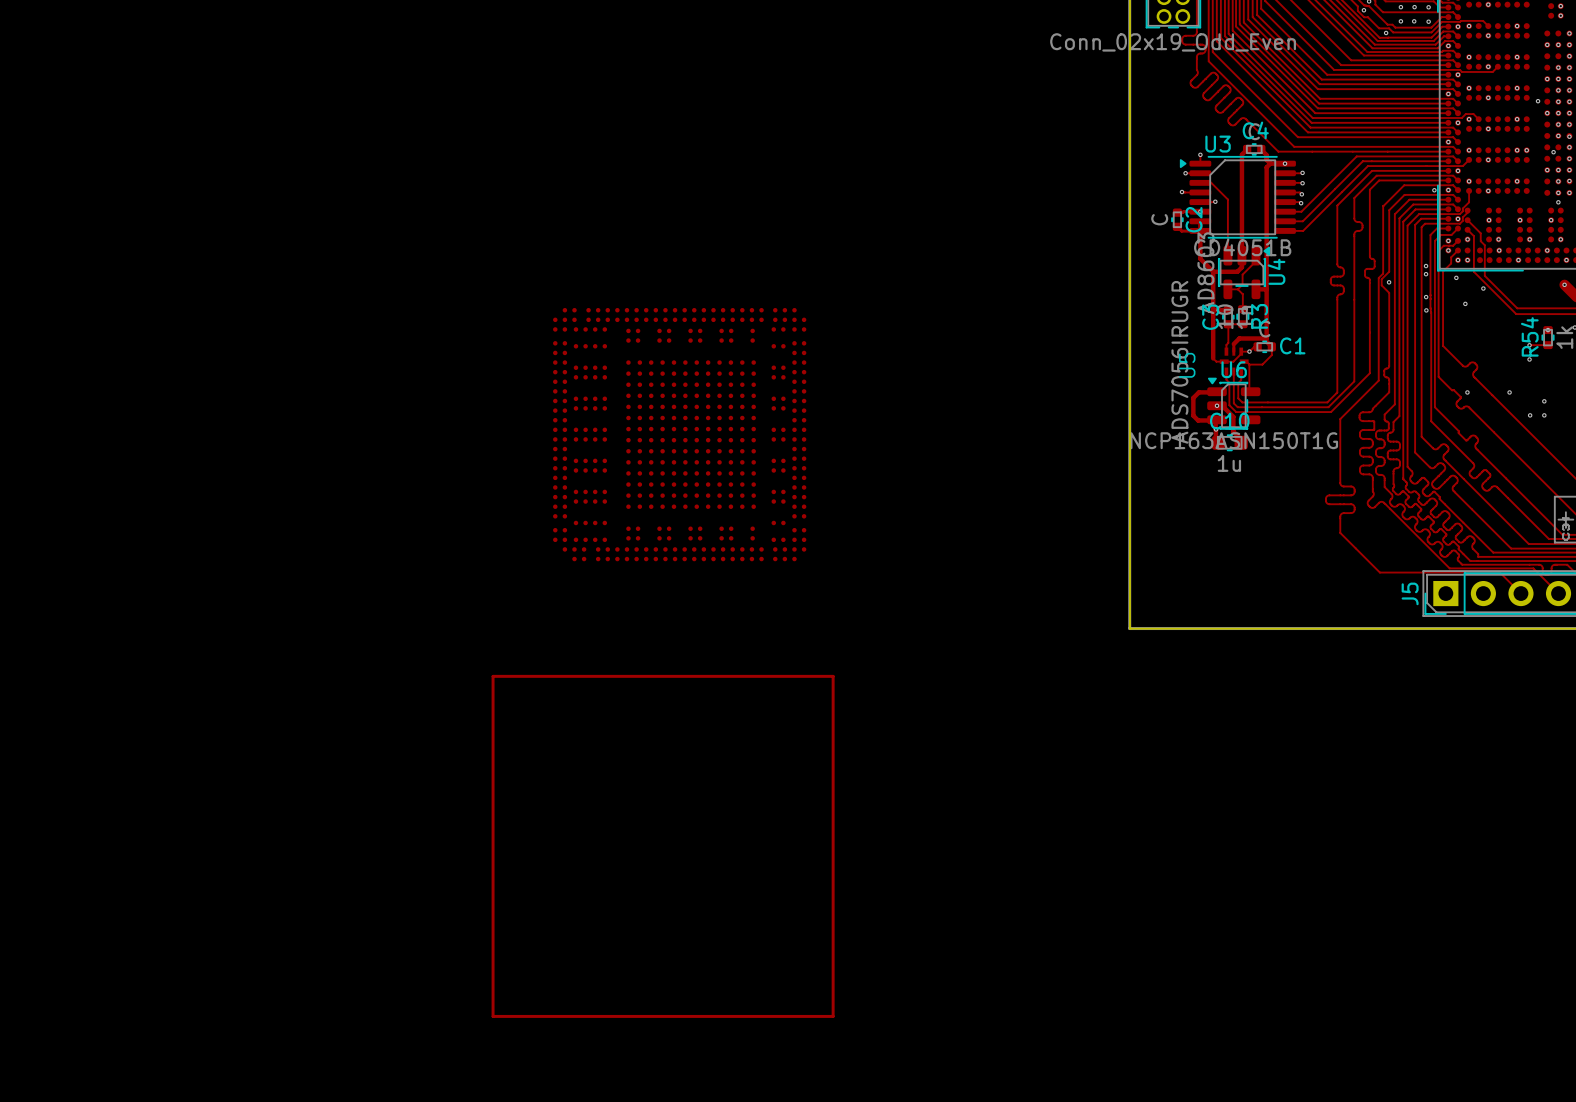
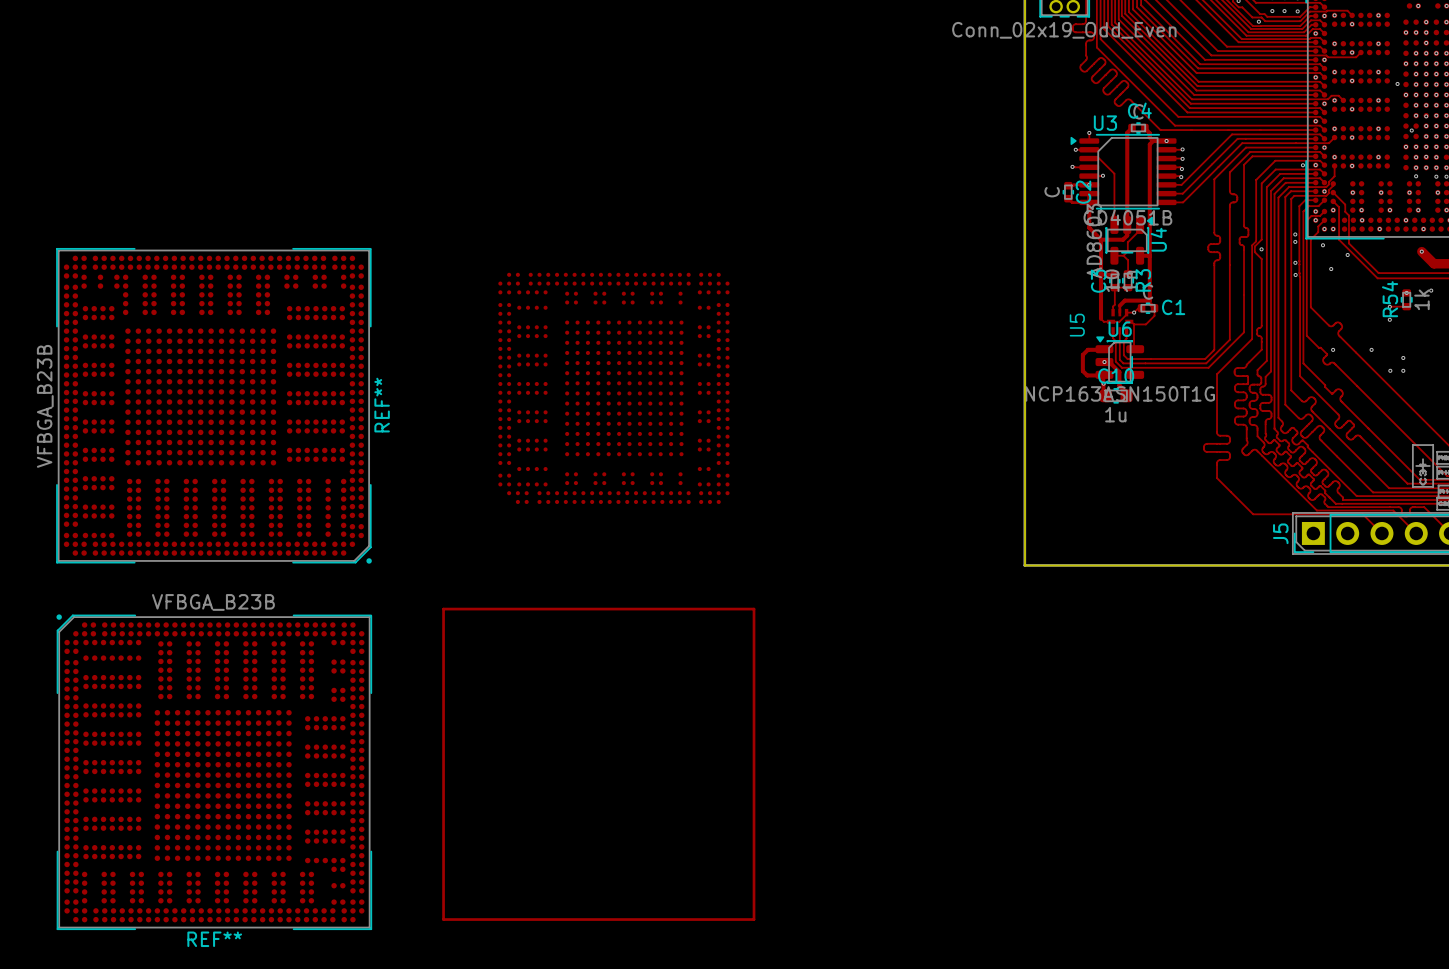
via: (1526, 150) -> none
U5 value: ADS7056IRUGR (1179, 362) -> none
REF**: none -> VFBGA_B23B (214, 405)
REF**: none -> VFBGA_B23B (214, 772)

